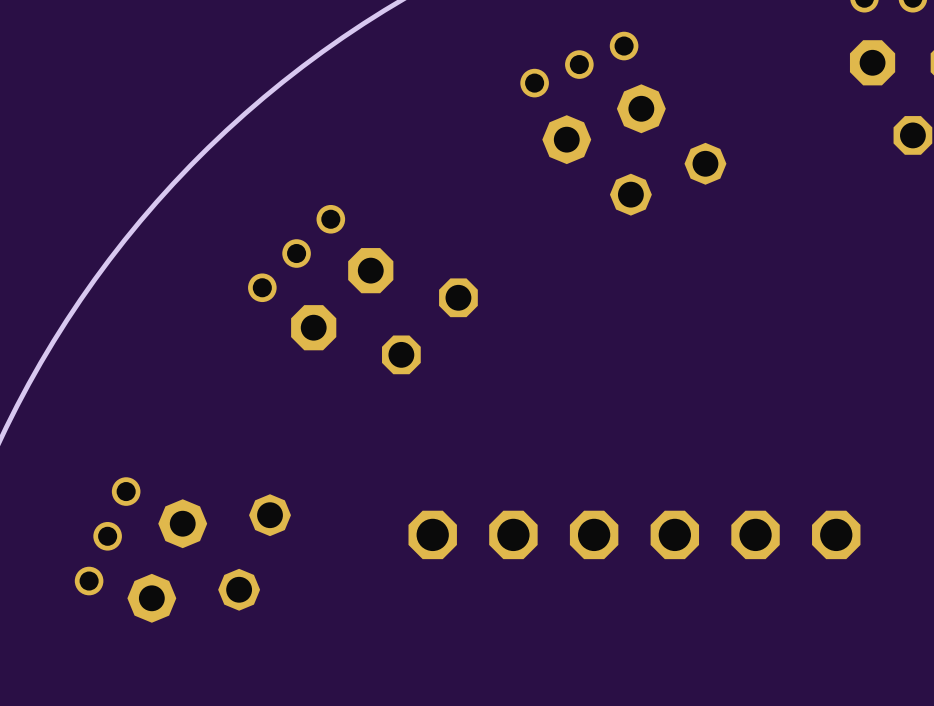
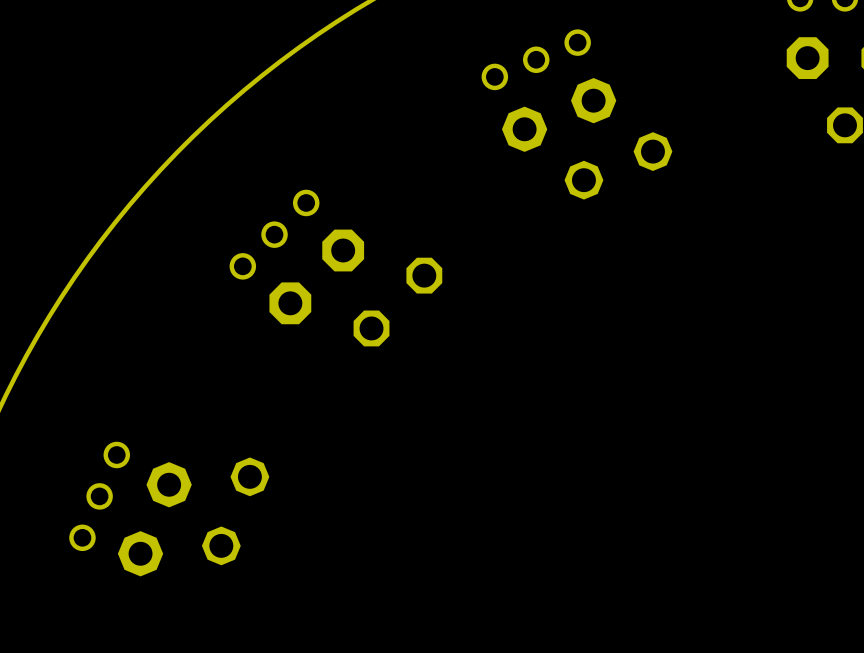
part: (634, 534) -> none

